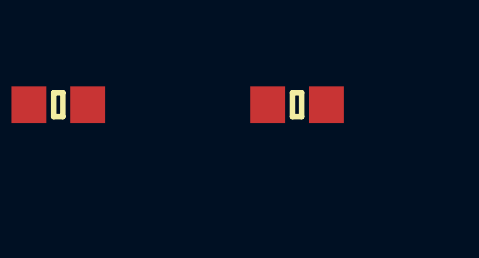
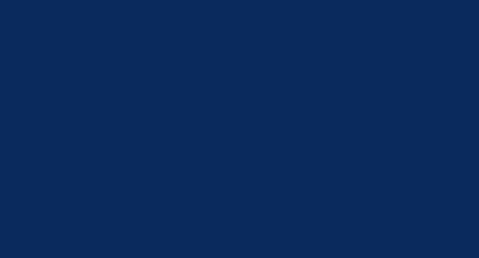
part: (58, 104) -> none
part: (297, 104) -> none

